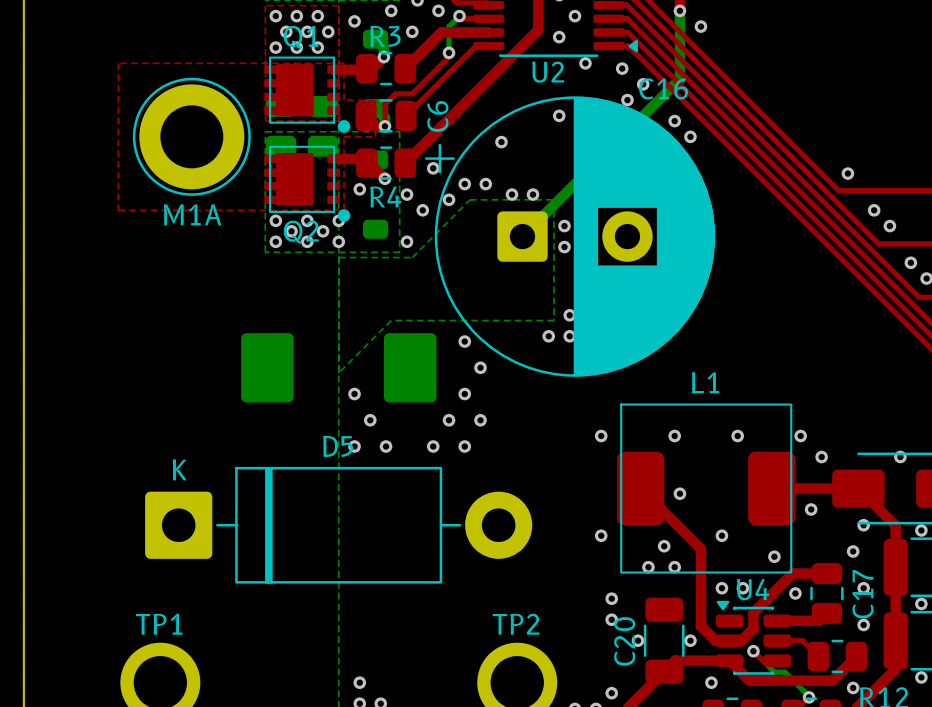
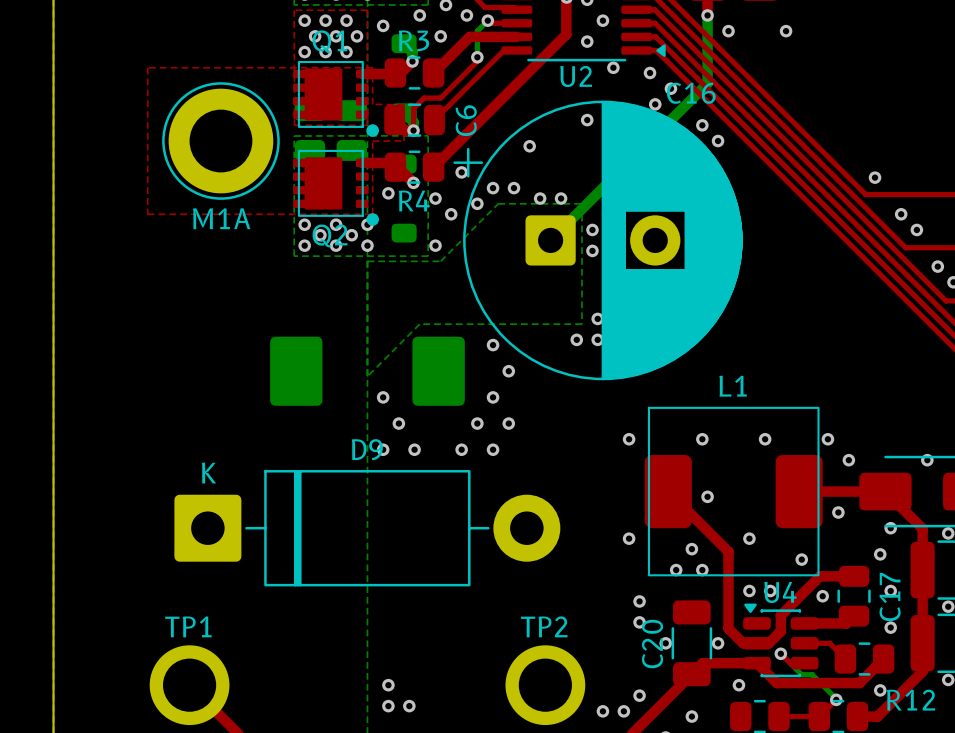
via: none -> (786, 31)
D5 name: D5 (338, 446) -> D9 (367, 449)

